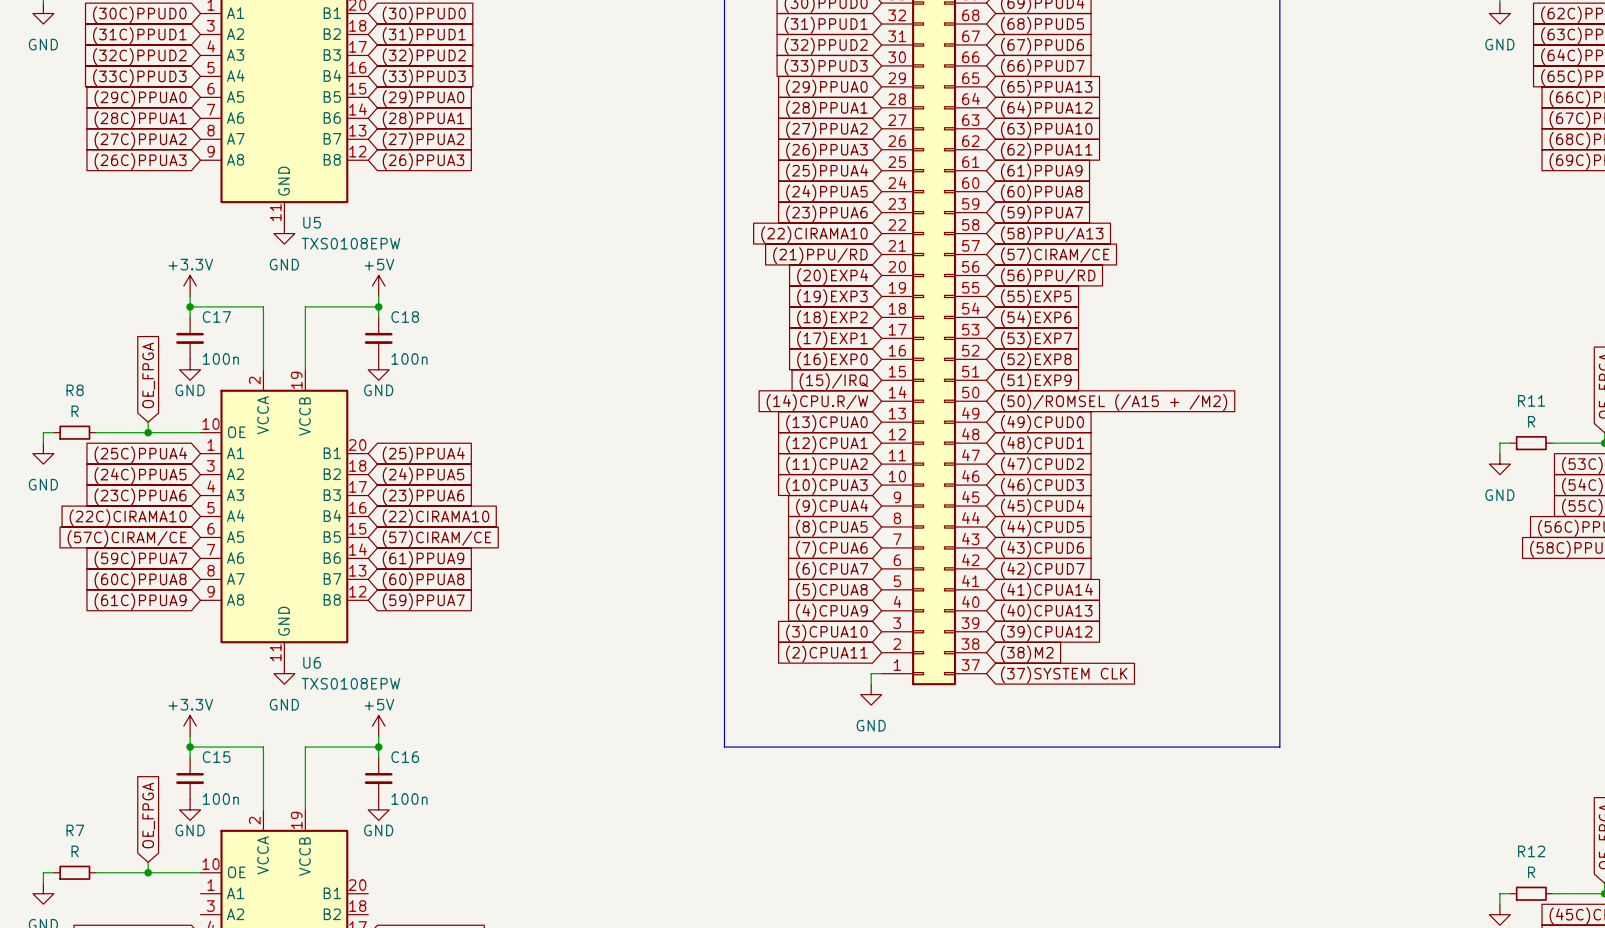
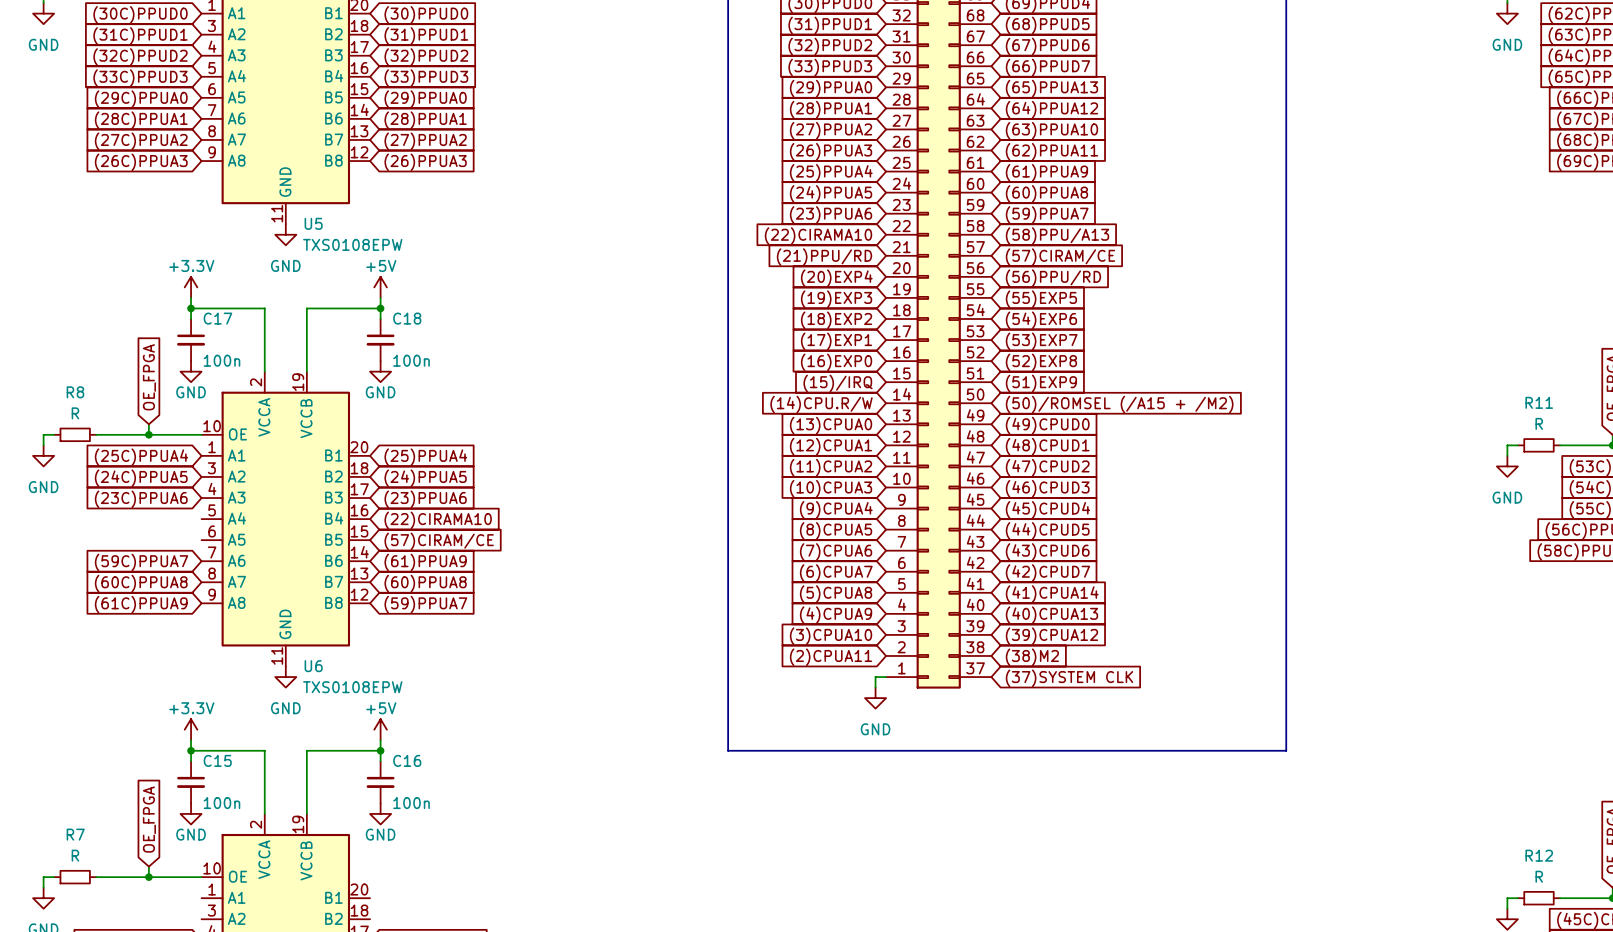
global label: (22C)CIRAMA10 (128, 517) -> none
global label: (57C)CIRAM/CE (127, 538) -> none

